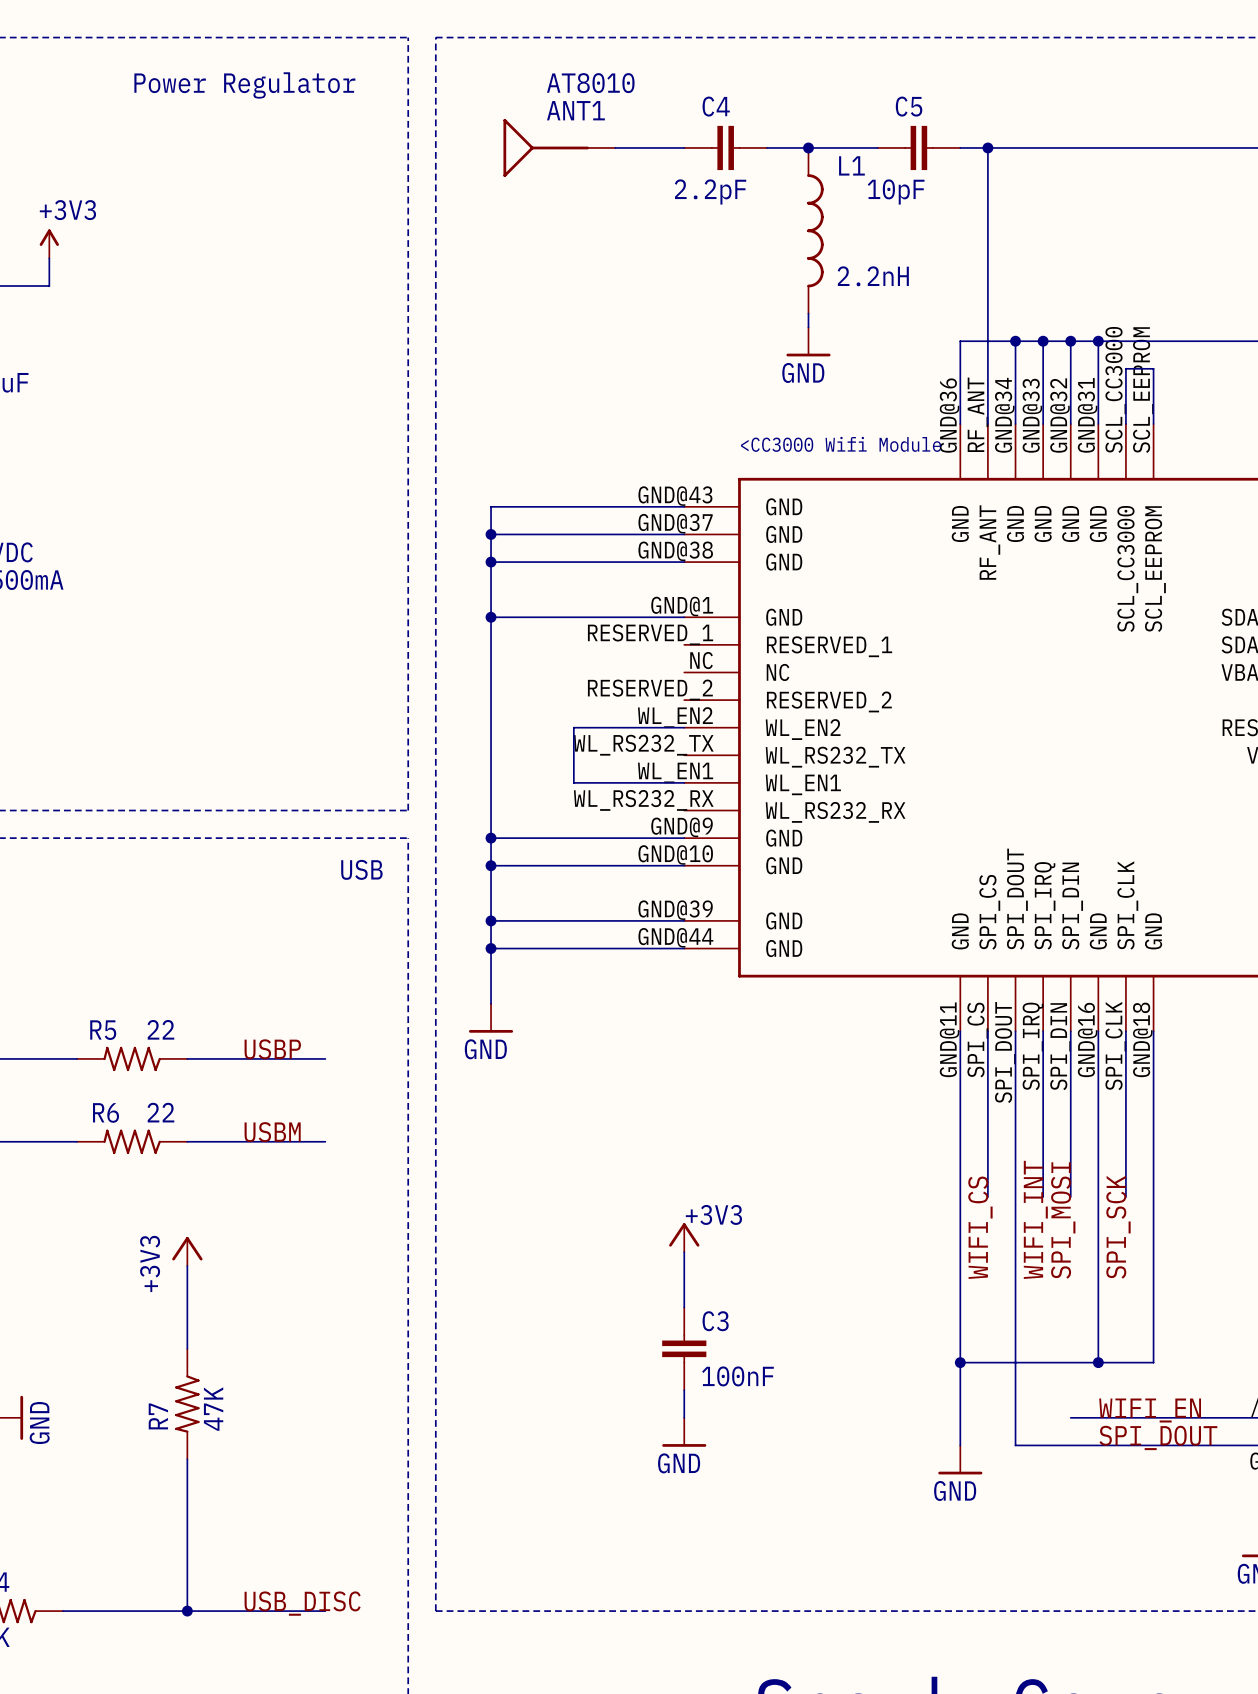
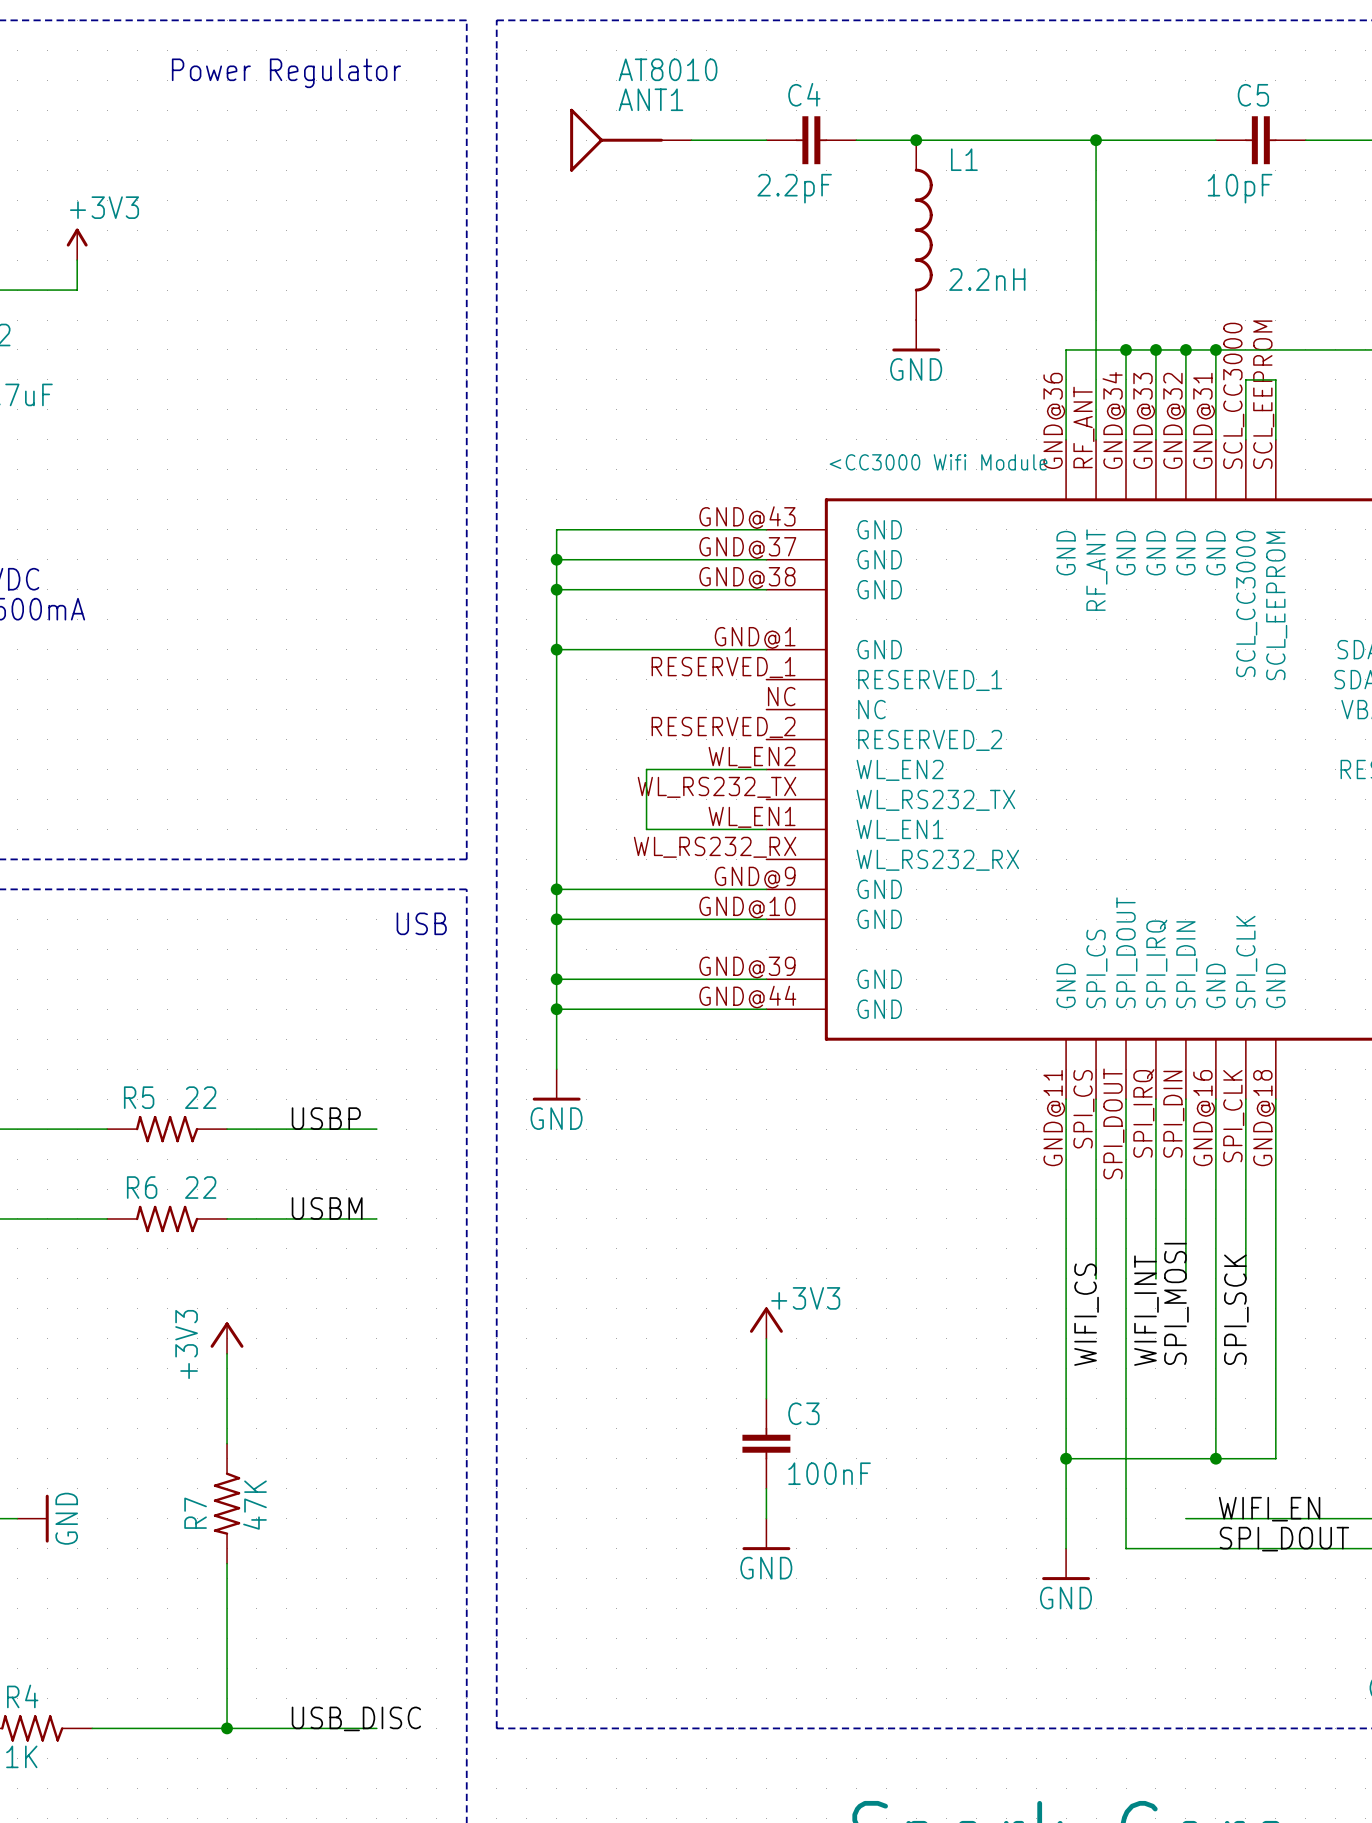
junction position: (808, 147) -> (916, 140)
C5 position: (918, 147) -> (1260, 140)
L1 position: (815, 230) -> (923, 230)
wire: (808, 313) (808, 327) -> none
power symbol position: GND (808, 341) -> GND (916, 335)

